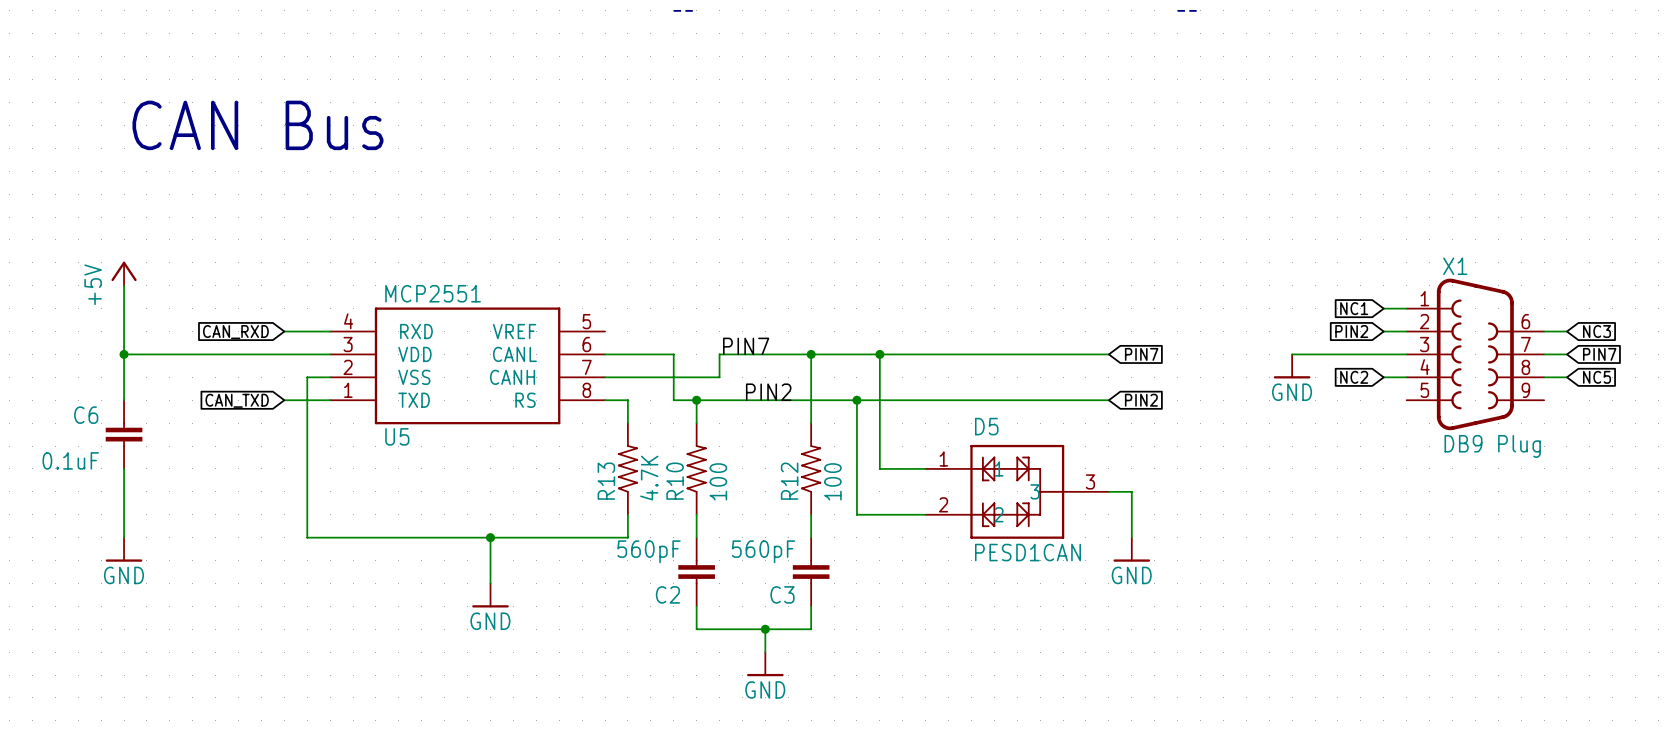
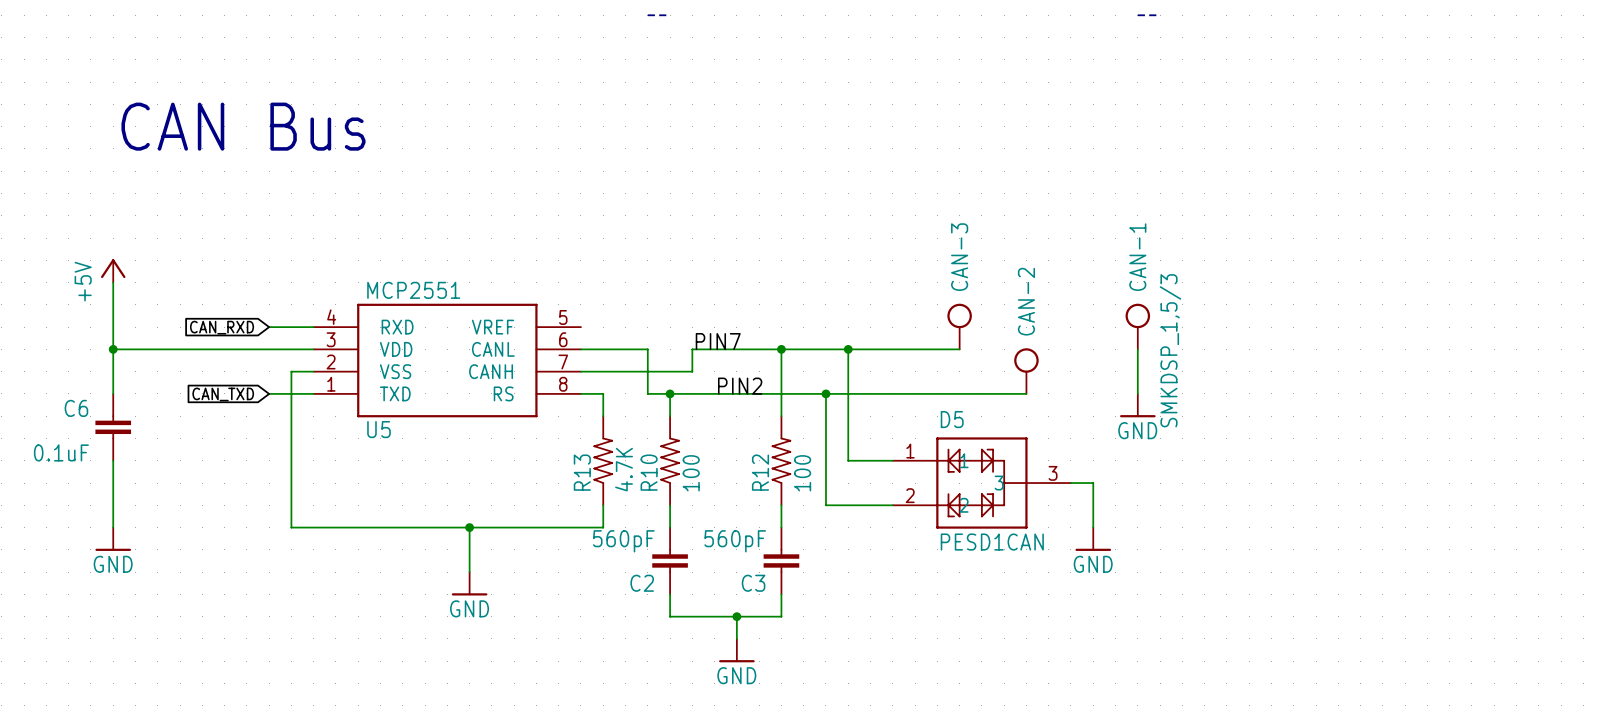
global label: NC1 (1354, 308) -> none
wire: (1383, 308) (1406, 308) -> none
CAN-3: none -> (959, 326)
CAN-1: none -> SMKDSP_1,5/3 (1137, 326)
global label: PIN2 (1351, 331) -> none
wire: (1383, 331) (1406, 331) -> none
wire: (1544, 331) (1566, 331) -> none
global label: NC3 (1597, 331) -> none
wire: (994, 354) (1108, 354) -> none
global label: PIN7 (1141, 354) -> none
wire: none -> (1137, 349) (1137, 393)
wire: (1292, 354) (1406, 354) -> none
X1: DB9 Plug (1475, 354) -> none
wire: (1544, 354) (1566, 354) -> none
global label: PIN7 (1599, 354) -> none
power symbol position: GND (1292, 366) -> GND (1137, 405)
CAN-2: none -> (1026, 371)
global label: NC2 (1354, 377) -> none
wire: (1383, 377) (1406, 377) -> none
wire: (1544, 377) (1566, 377) -> none
global label: NC5 (1597, 377) -> none
wire: (1063, 400) (1108, 400) -> none
global label: PIN2 (1141, 400) -> none

